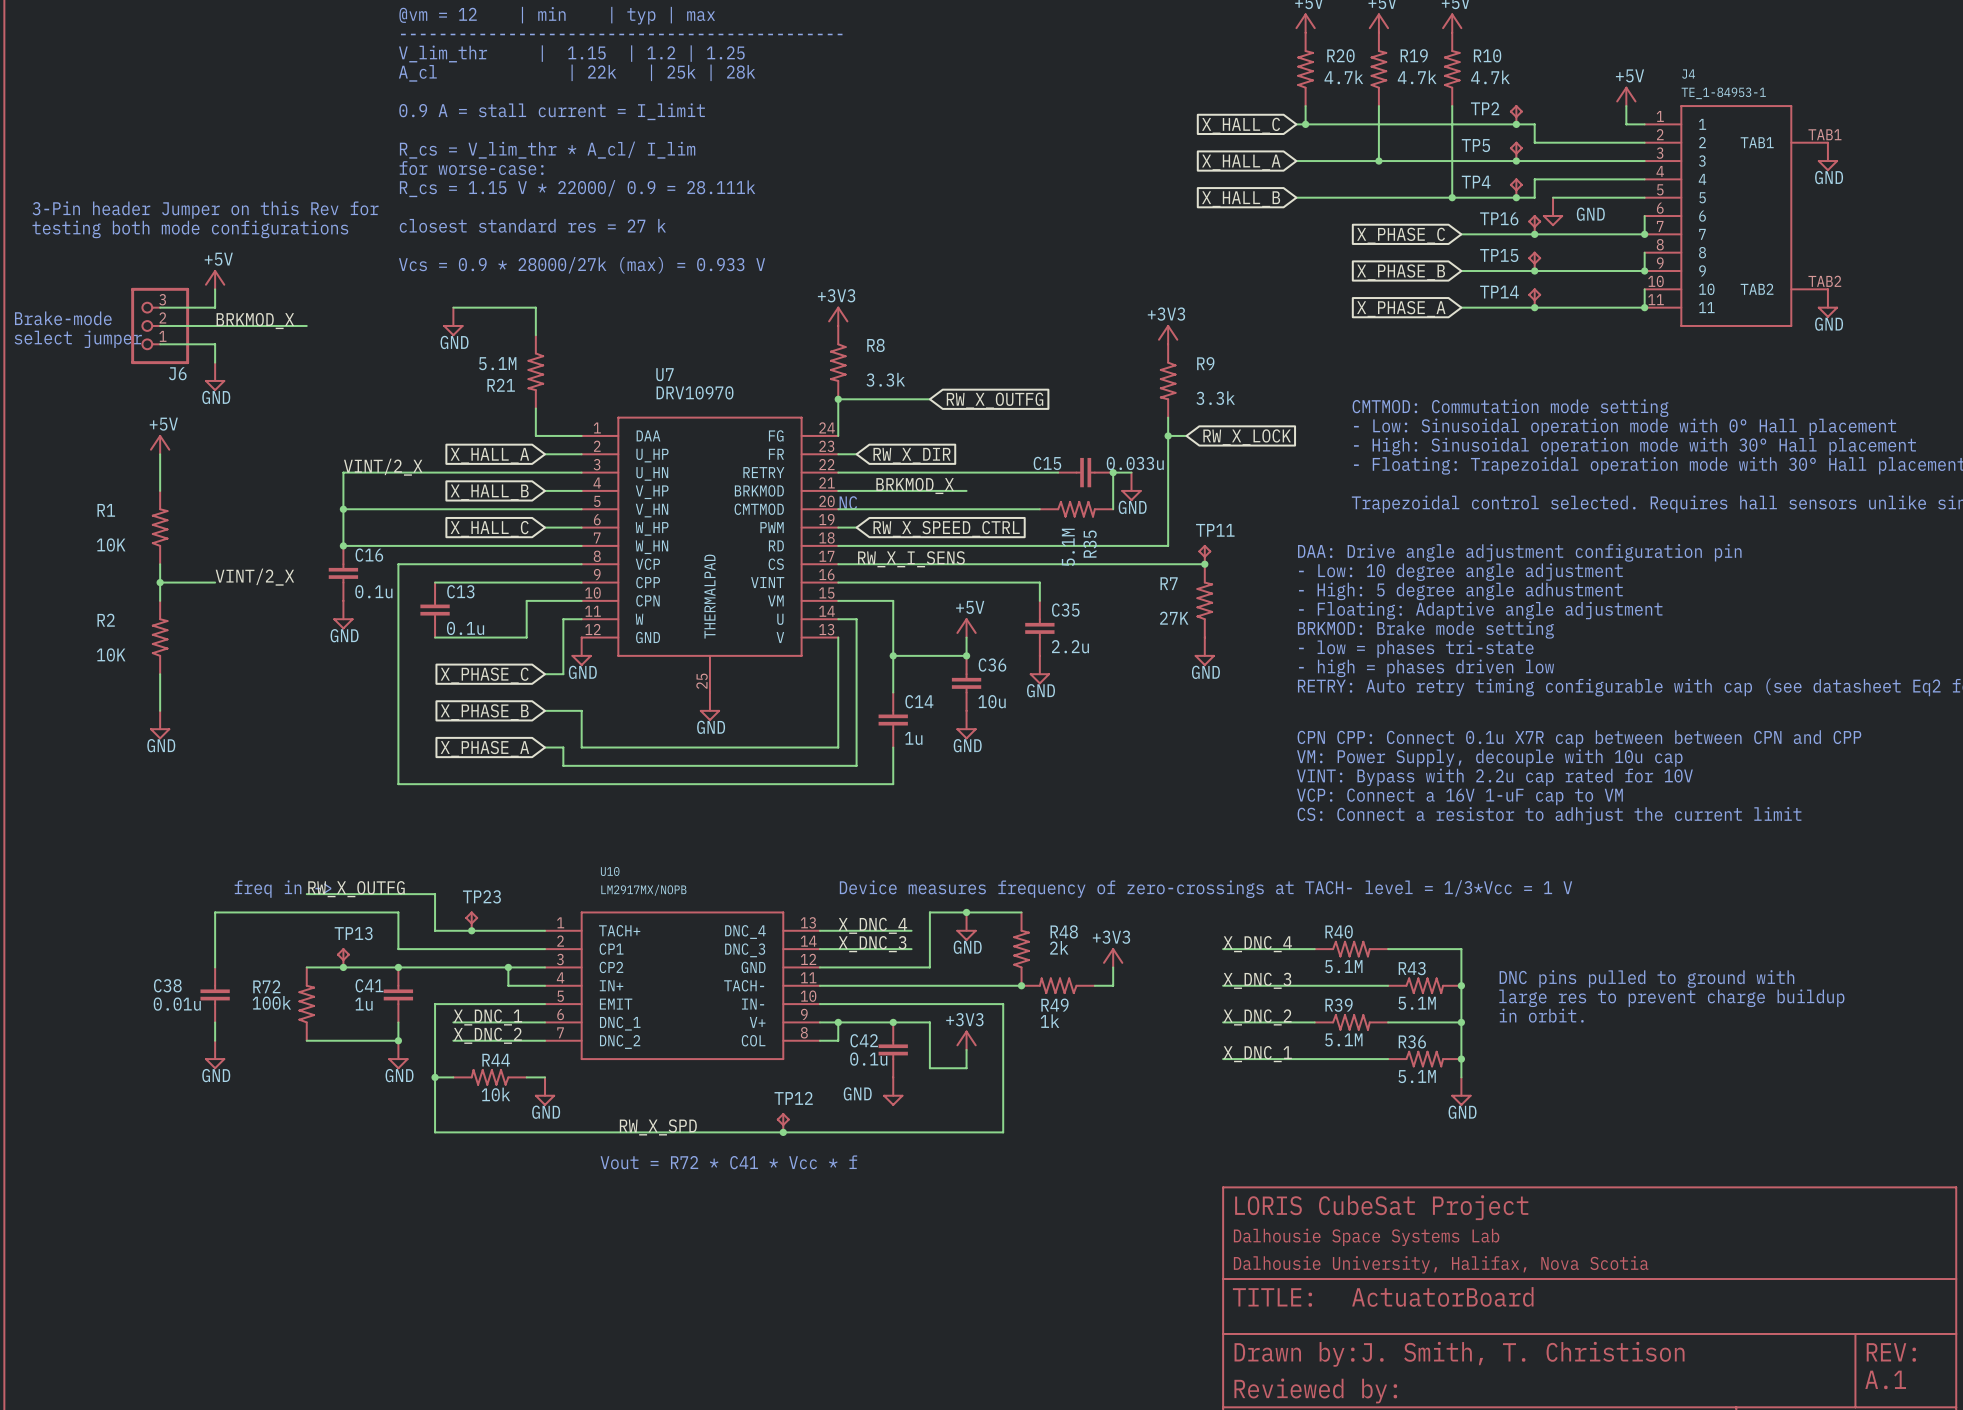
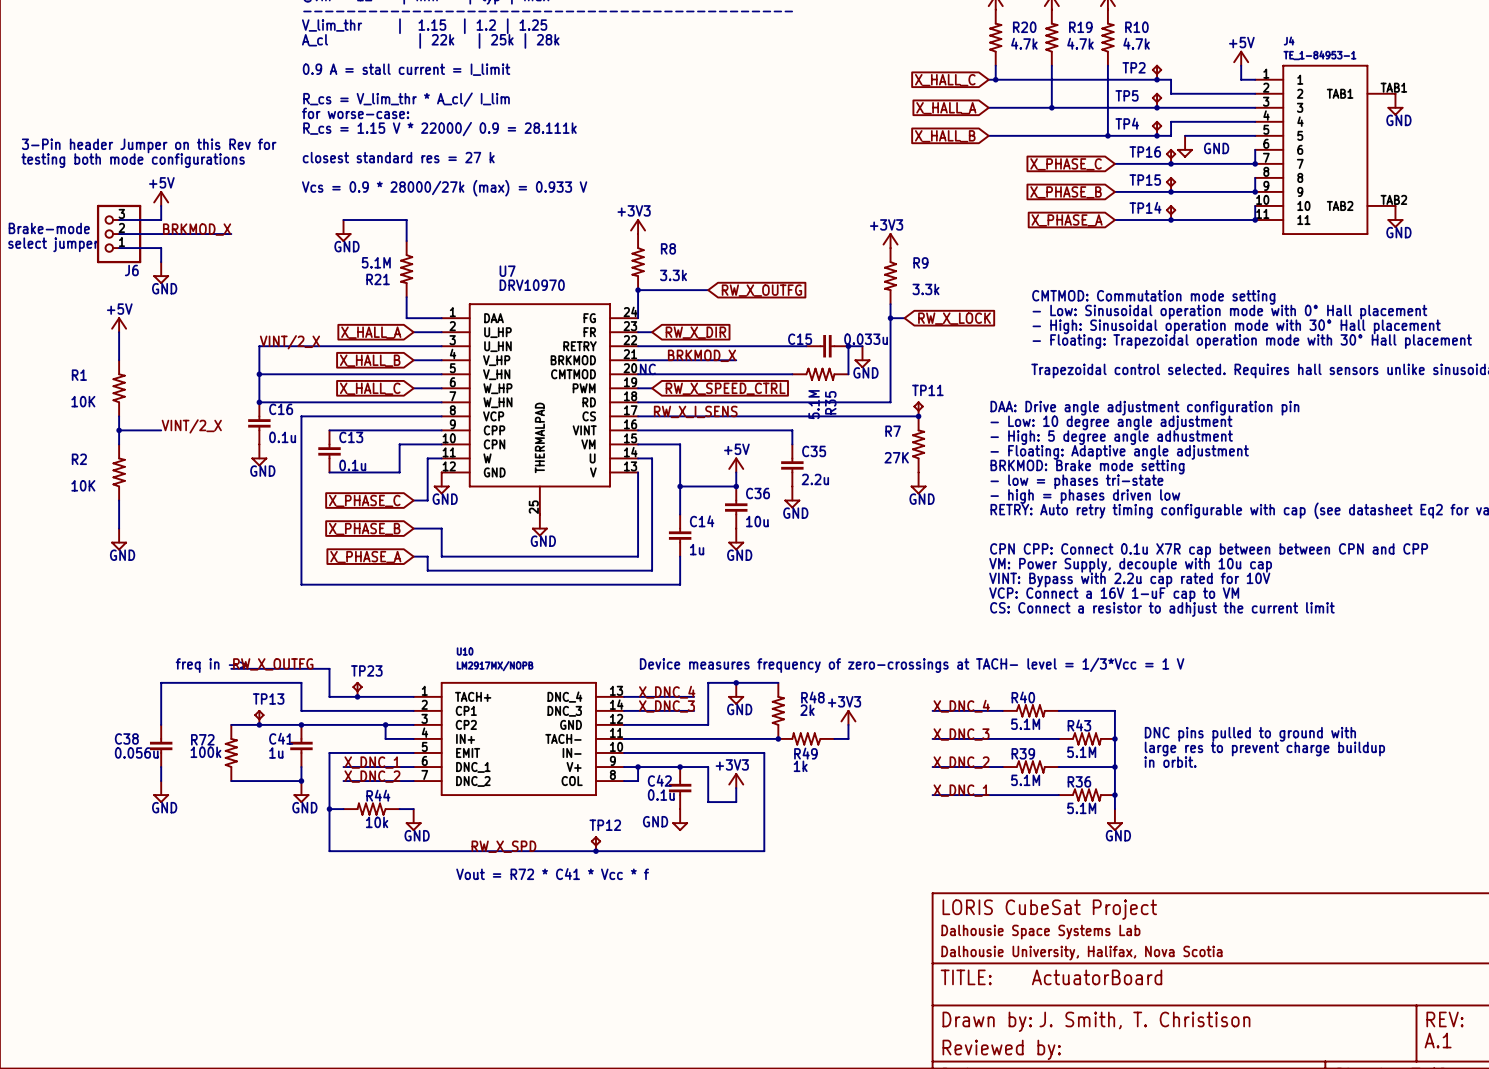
C38 value: 0.01u (177, 1004) -> 0.056u (136, 752)

